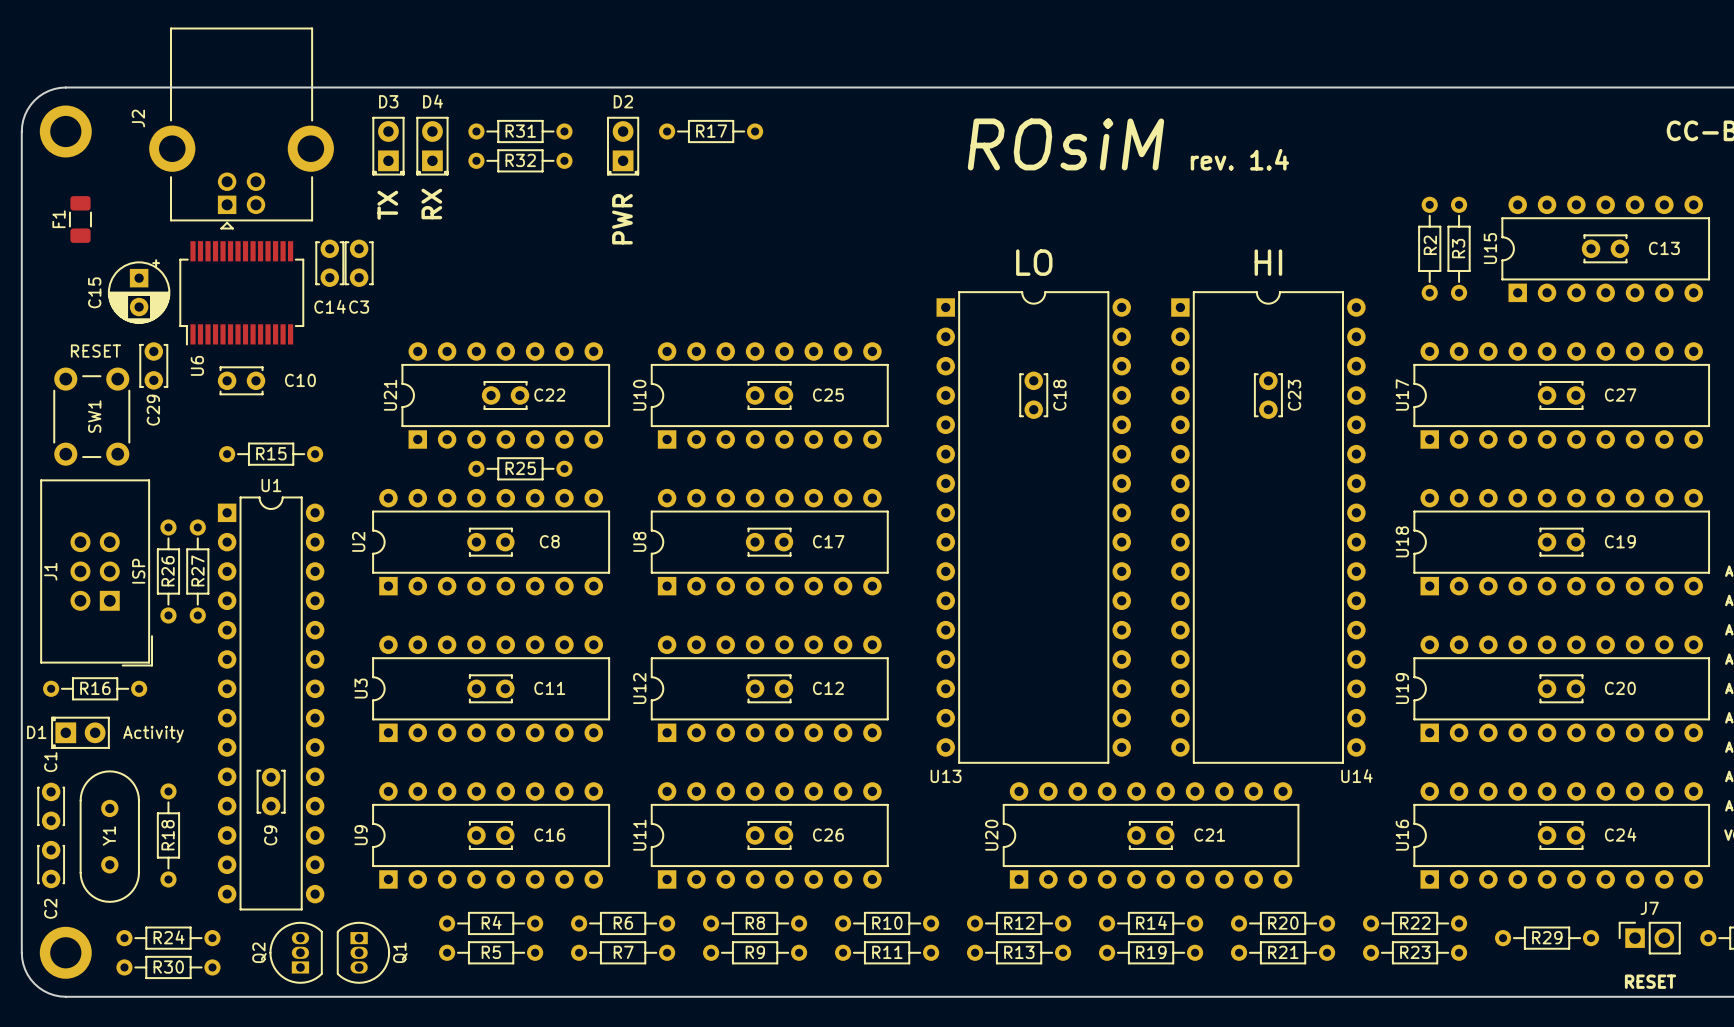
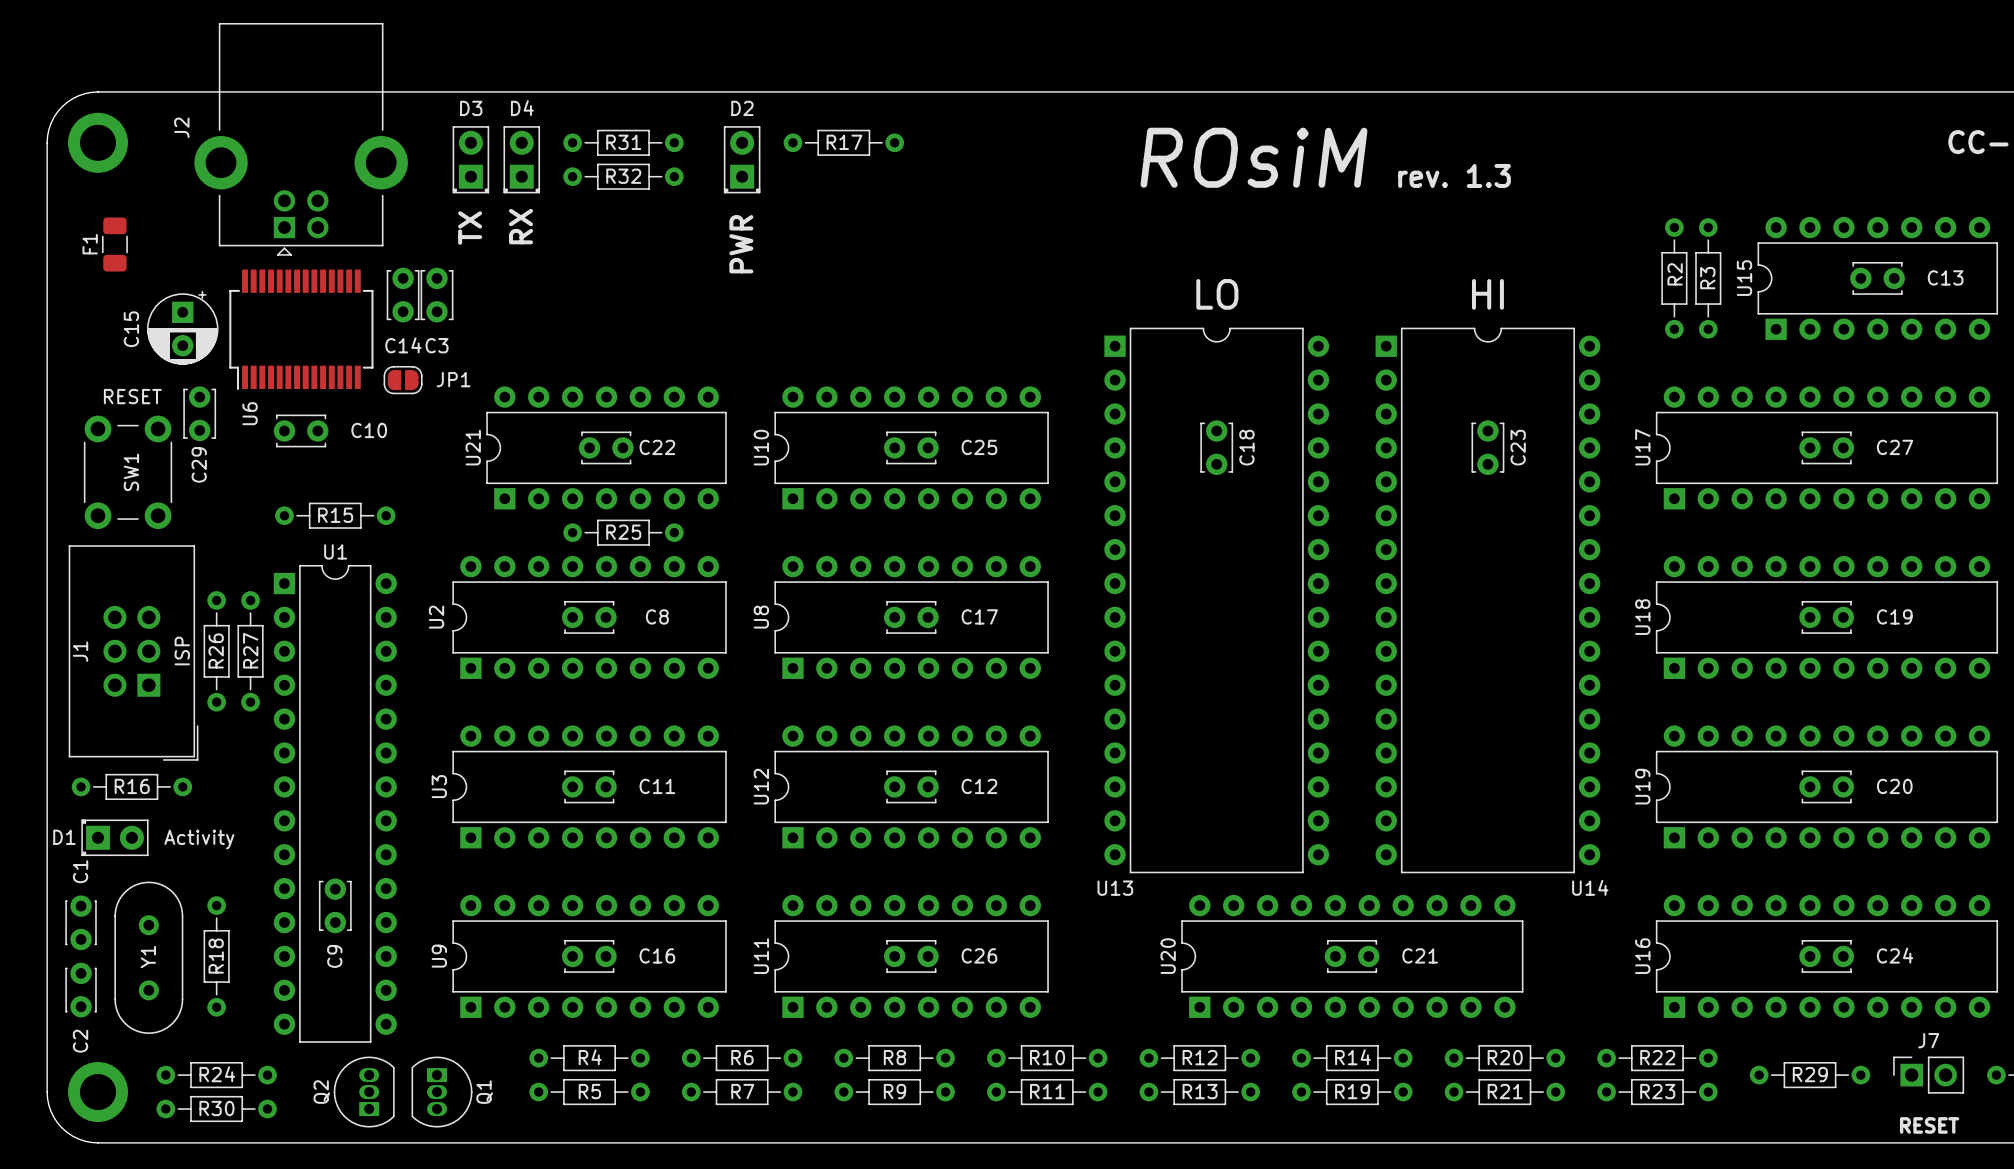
text: rev. 1.4 (1239, 159) -> rev. 1.3 (1454, 175)
JP1: none -> (403, 380)

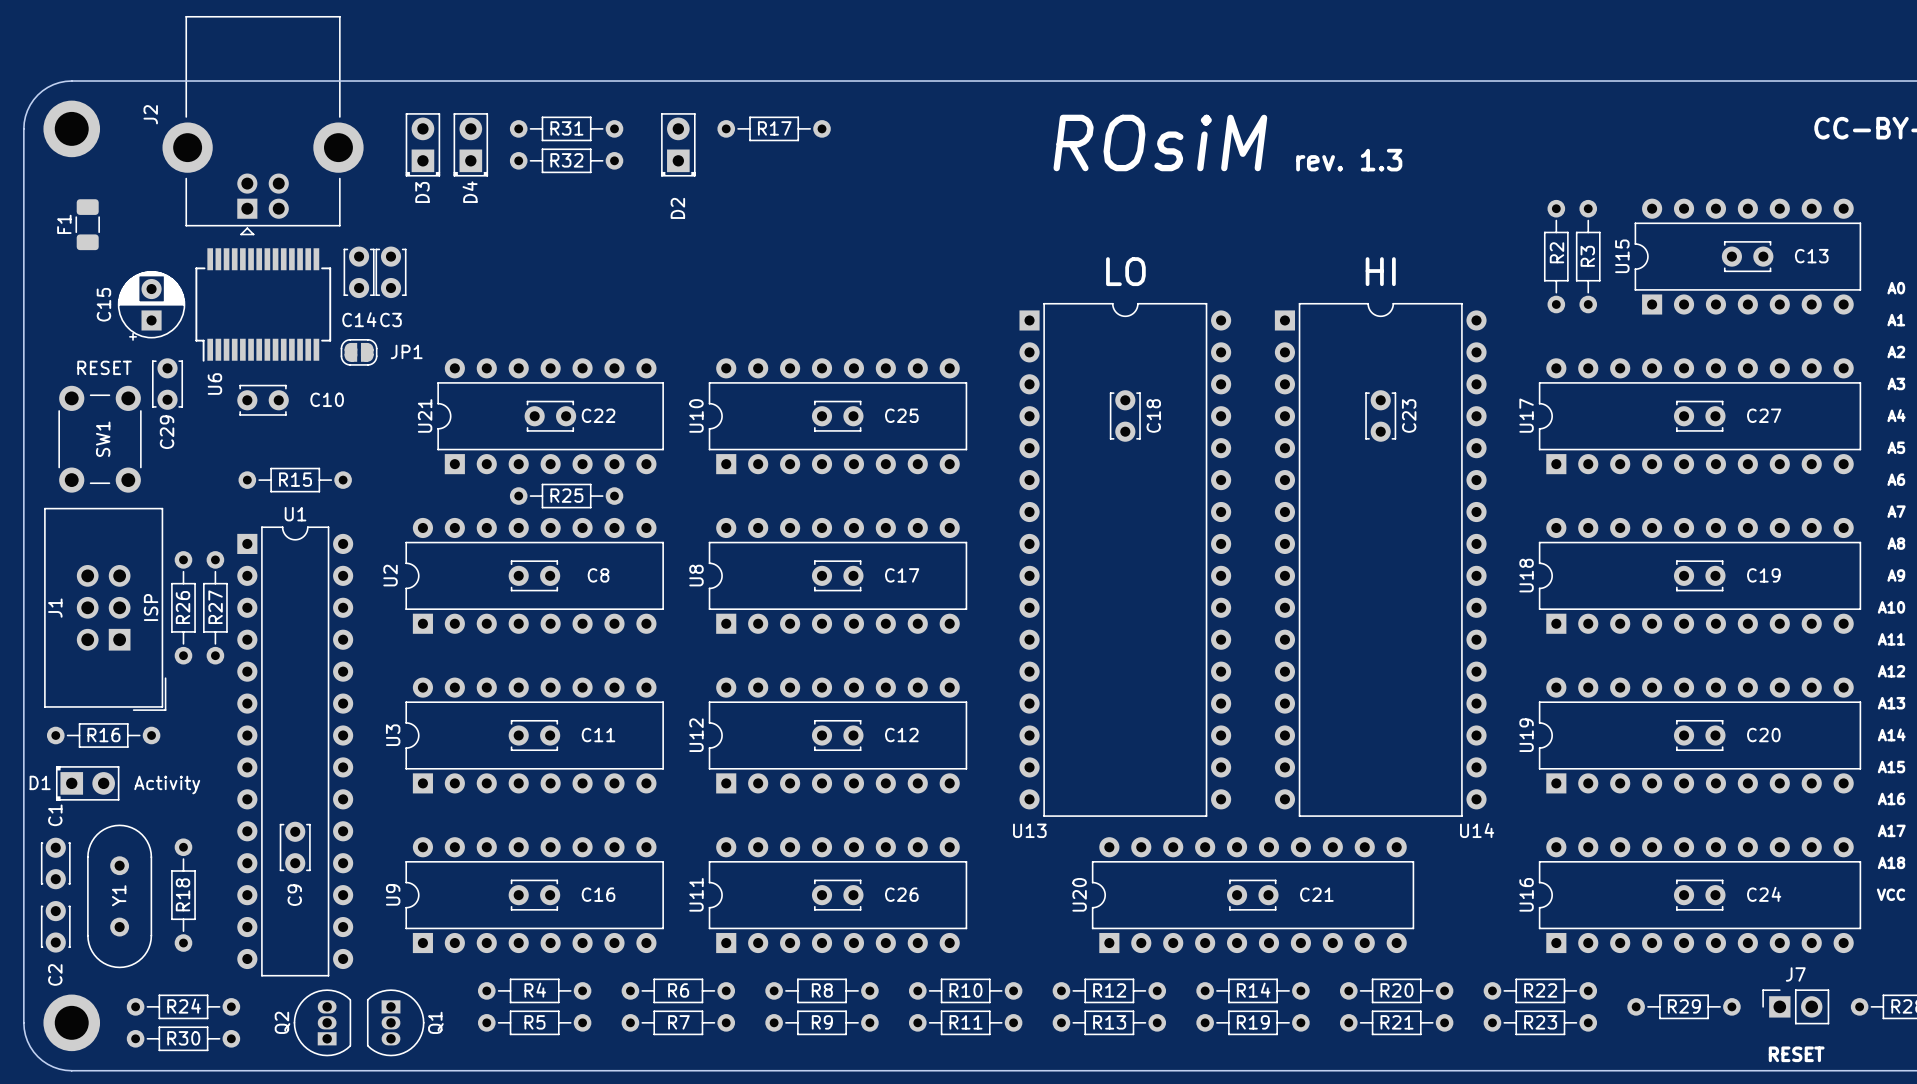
D3 name rotation: 0° (471, 108) -> 90° counterclockwise (422, 192)
D3 name position: D3 (471, 108) -> D3 (422, 192)
D4 name rotation: 0° (522, 108) -> 90° counterclockwise (470, 192)
D4 name position: D4 (522, 108) -> D4 (470, 192)
D2 name rotation: 0° (742, 108) -> 90° counterclockwise (677, 208)
D2 name position: D2 (742, 108) -> D2 (677, 208)
text: RX (521, 226) -> none
text: TX (470, 228) -> none
text: PWR (741, 244) -> none
C15 rotation: 0° (182, 327) -> 180° (151, 305)

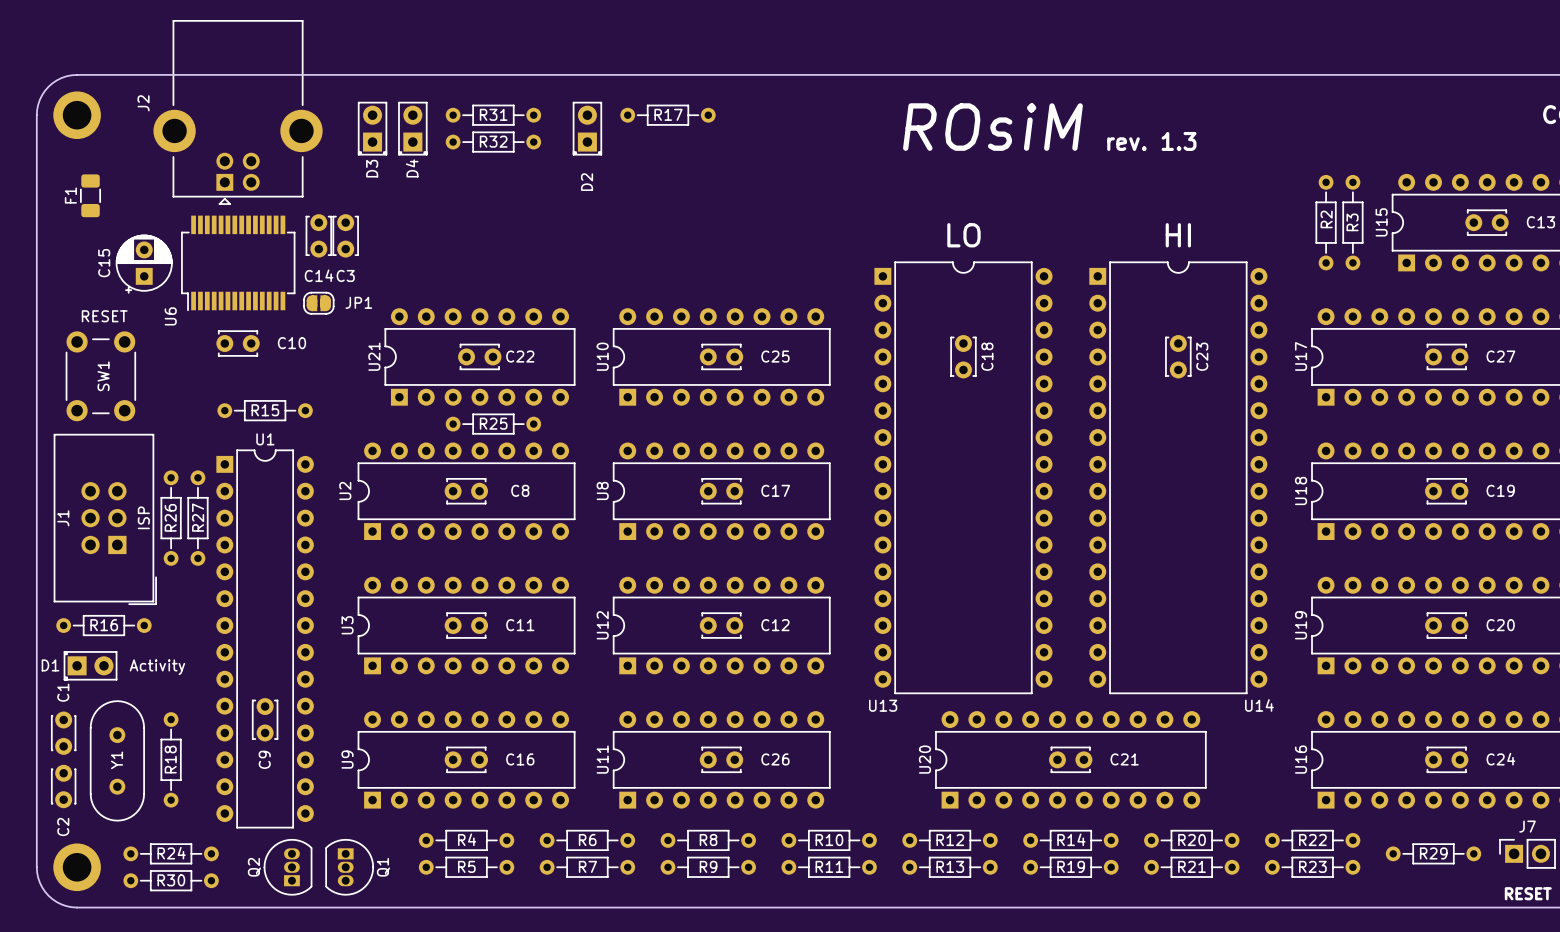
C29: (167, 384) -> none
U6 name position: U6 (214, 384) -> U6 (170, 316)

